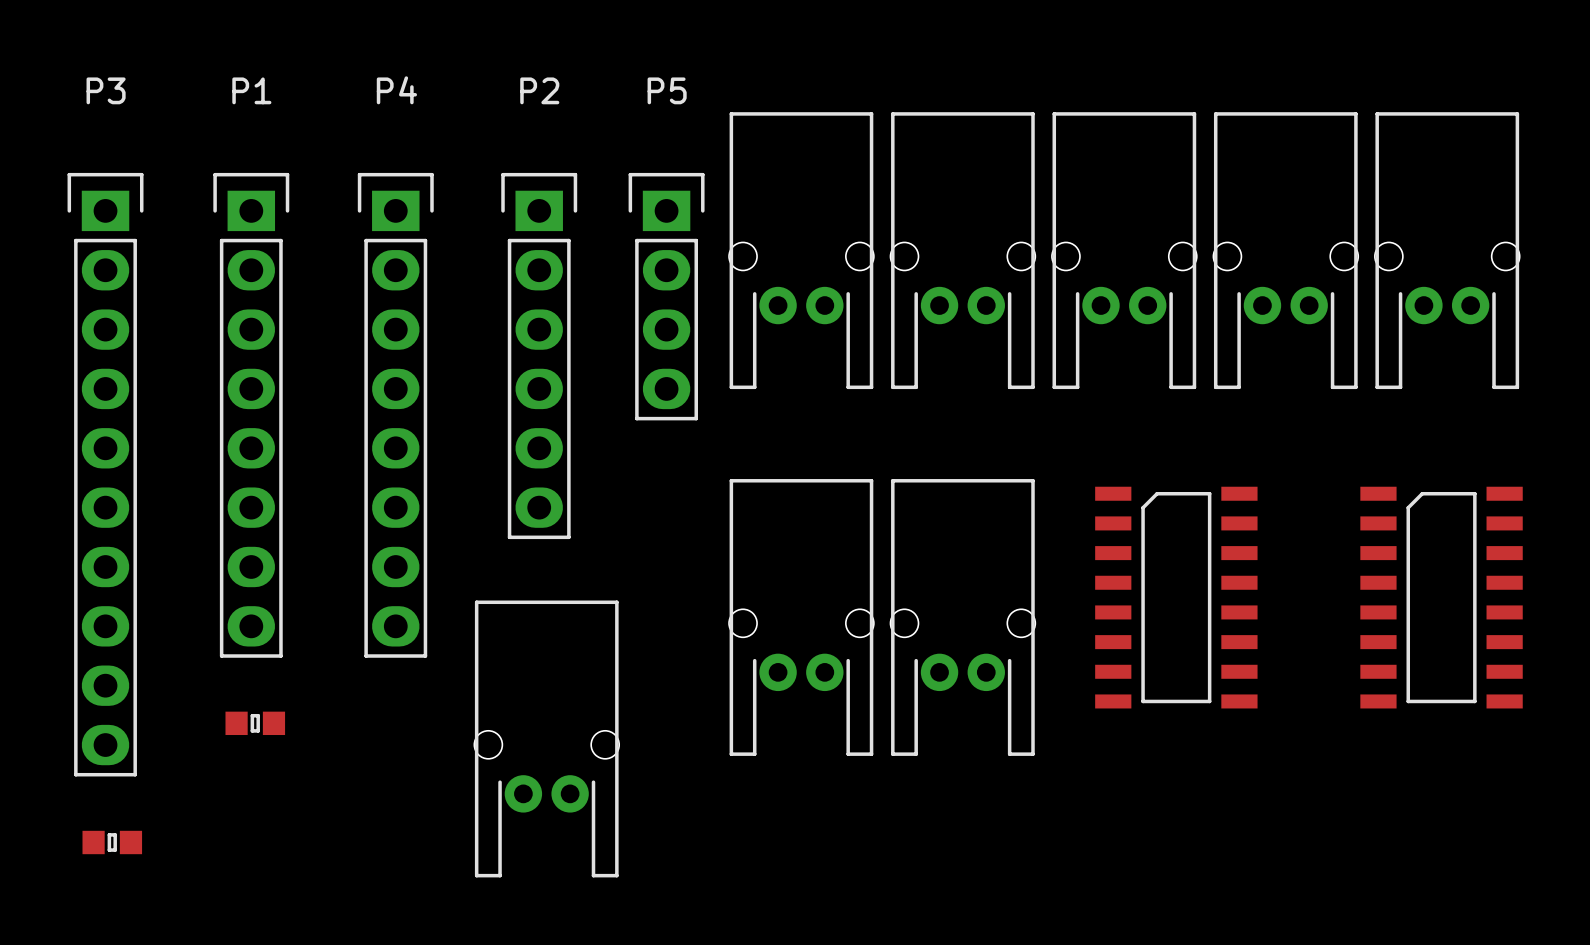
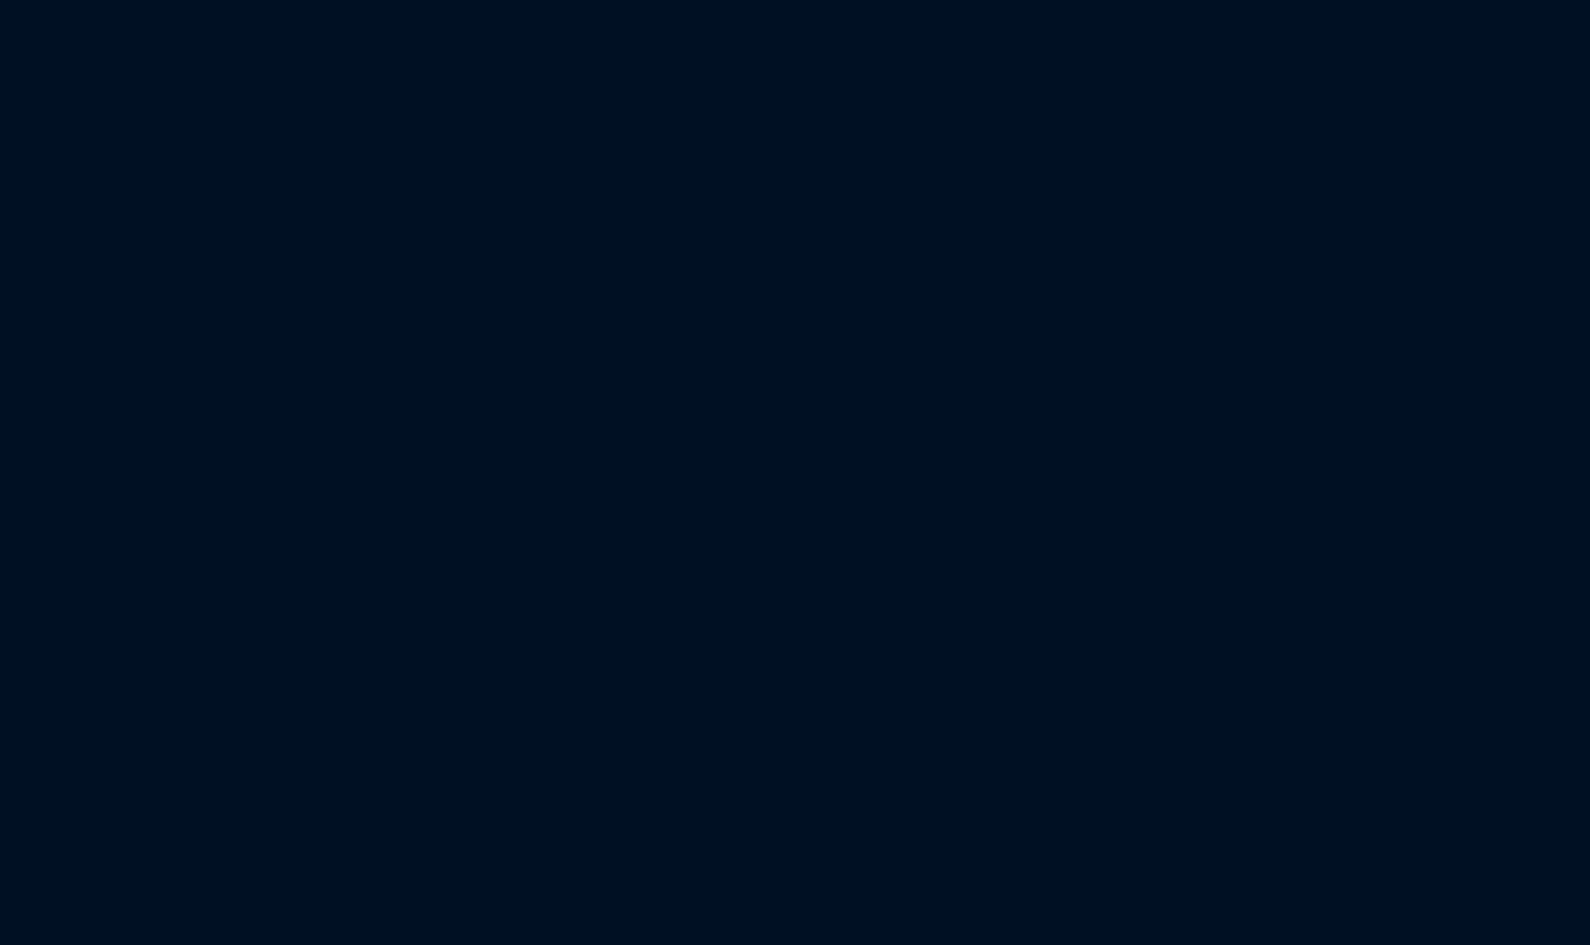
part: (801, 250) -> none
part: (962, 250) -> none
part: (1124, 250) -> none
part: (1285, 250) -> none
part: (1447, 250) -> none
P5: (666, 296) -> none
P2: (539, 356) -> none
P1: (251, 415) -> none
P4: (395, 415) -> none
P3: (105, 474) -> none
part: (1176, 597) -> none
part: (1441, 597) -> none
part: (801, 617) -> none
part: (962, 617) -> none
part: (255, 723) -> none
part: (546, 738) -> none
part: (112, 842) -> none

